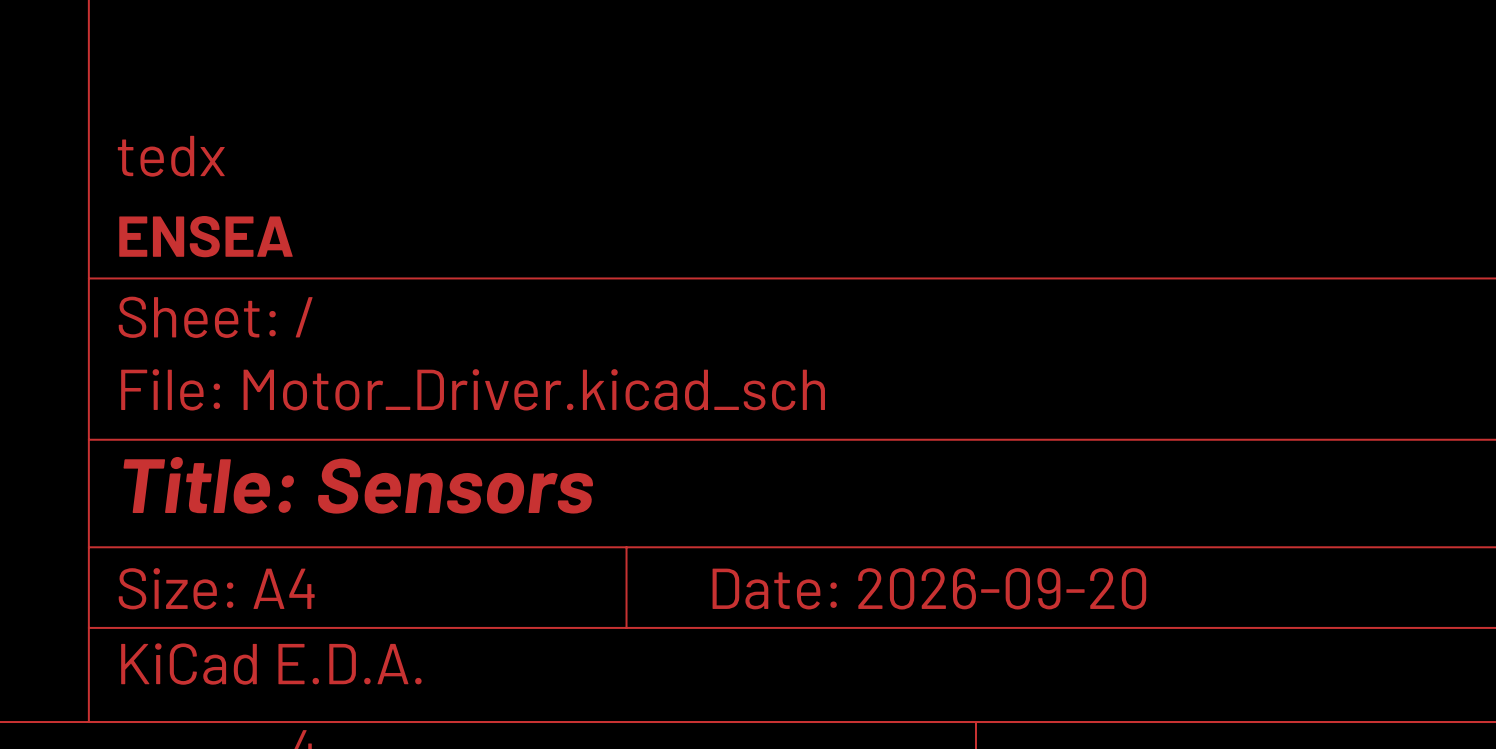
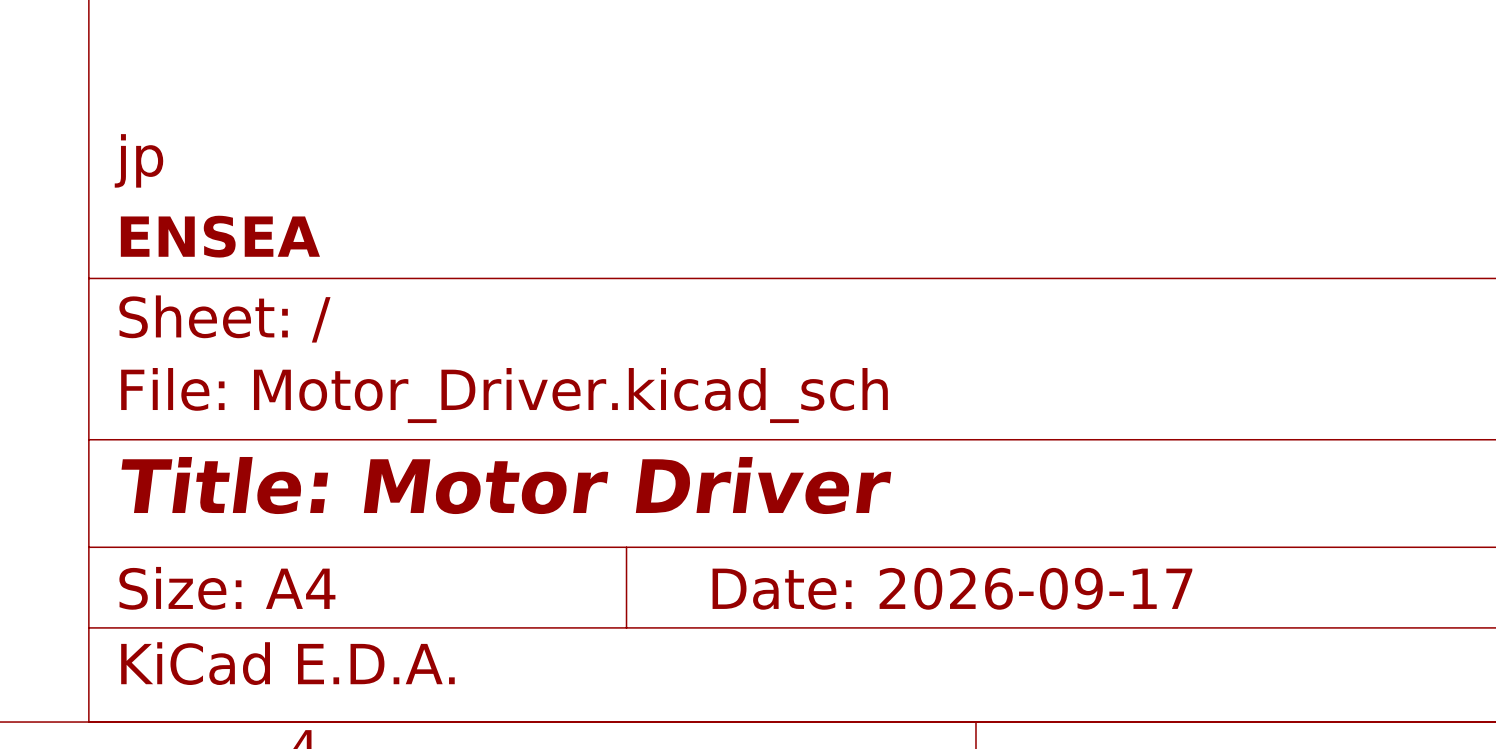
title block: tedx (171, 156) -> jp (138, 160)
title block: Title: Sensors (358, 485) -> Title: Motor Driver (506, 485)
title block: Date: 2026-09-20 (929, 588) -> Date: 2026-09-17 (952, 588)

